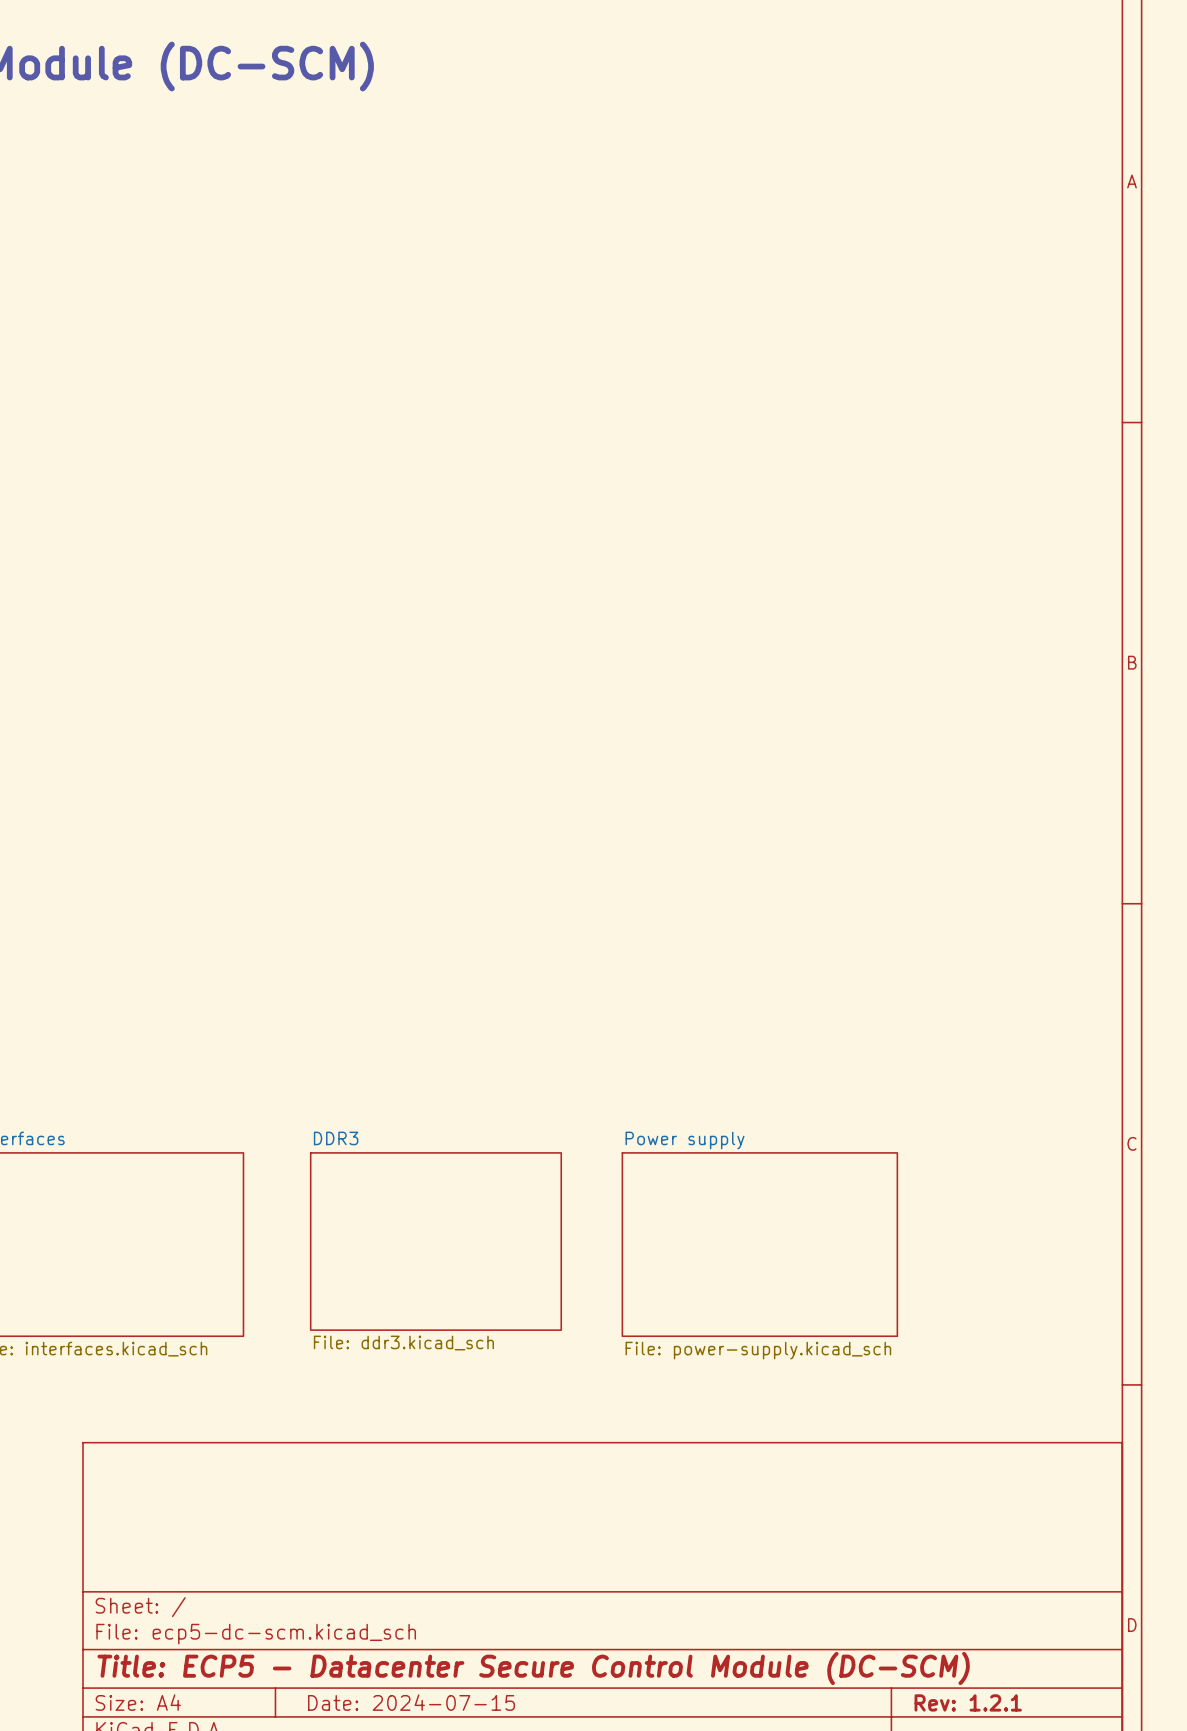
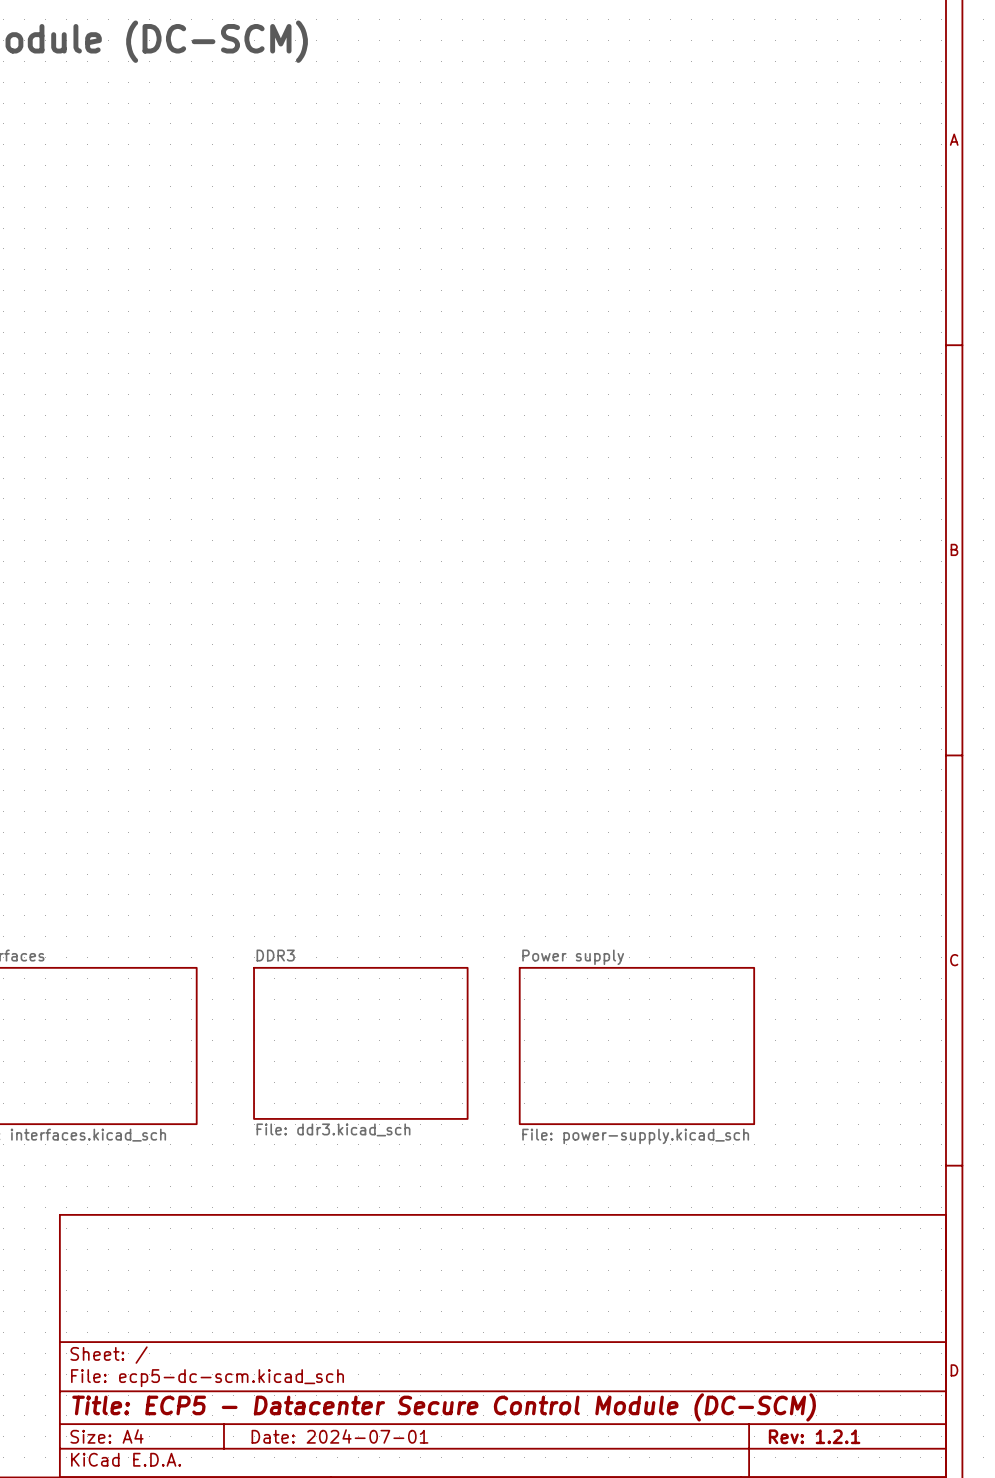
title block: Date: 2024-07-15 (411, 1702) -> Date: 2024-07-01 (339, 1436)

